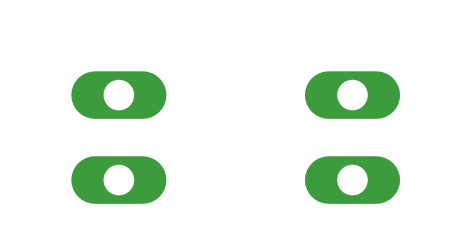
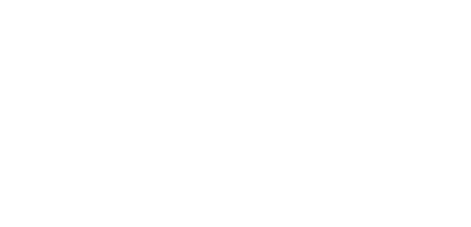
part: (118, 137) -> none
part: (352, 137) -> none

